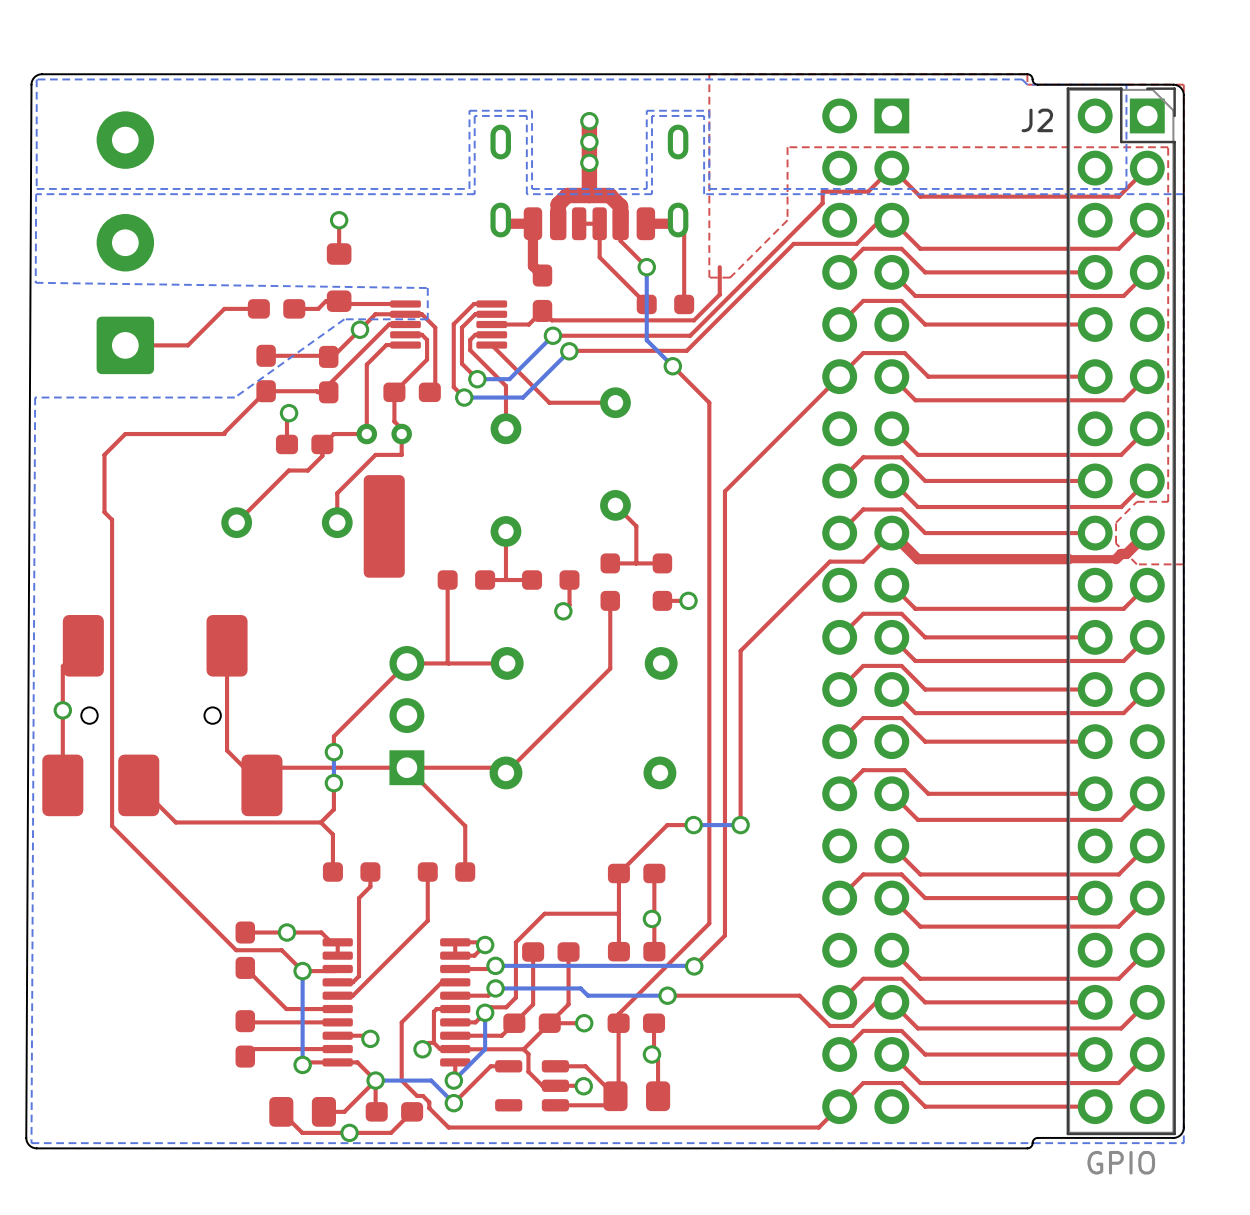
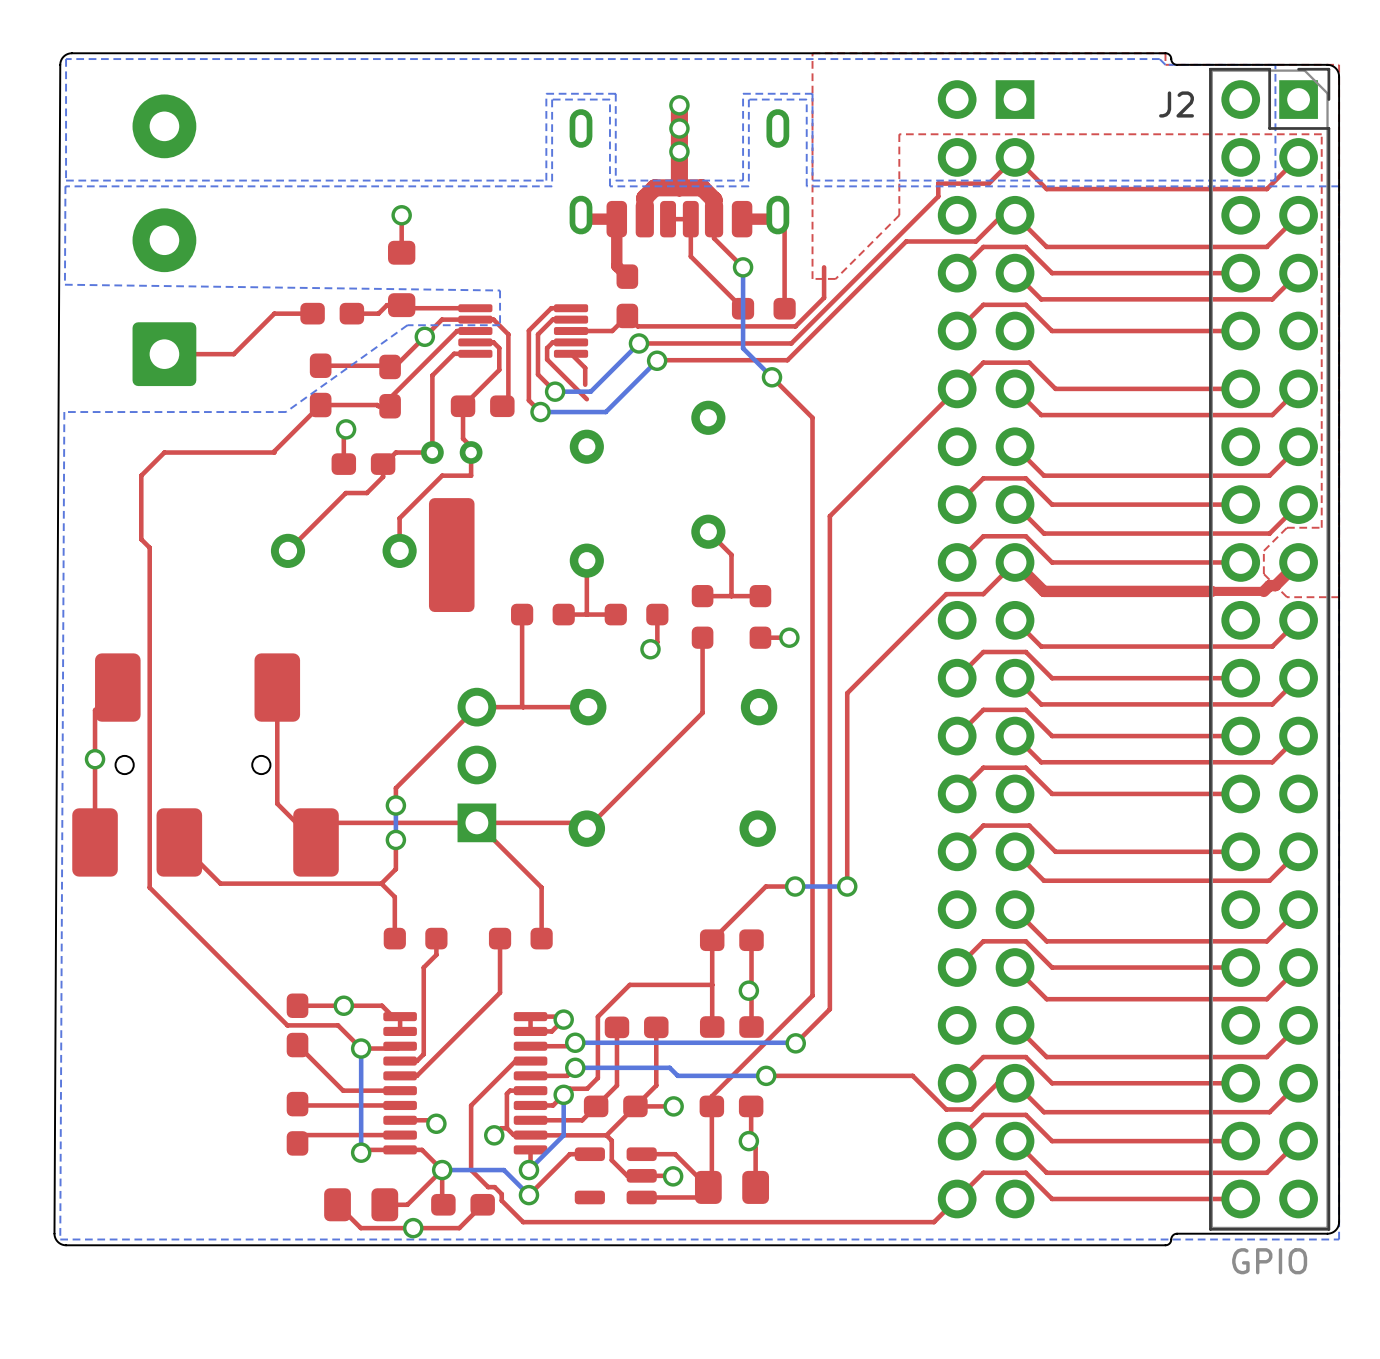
top track: (504, 357) (549, 402) (615, 402) -> (585, 367) (585, 384)
top track: (505, 386) (505, 428) -> none

